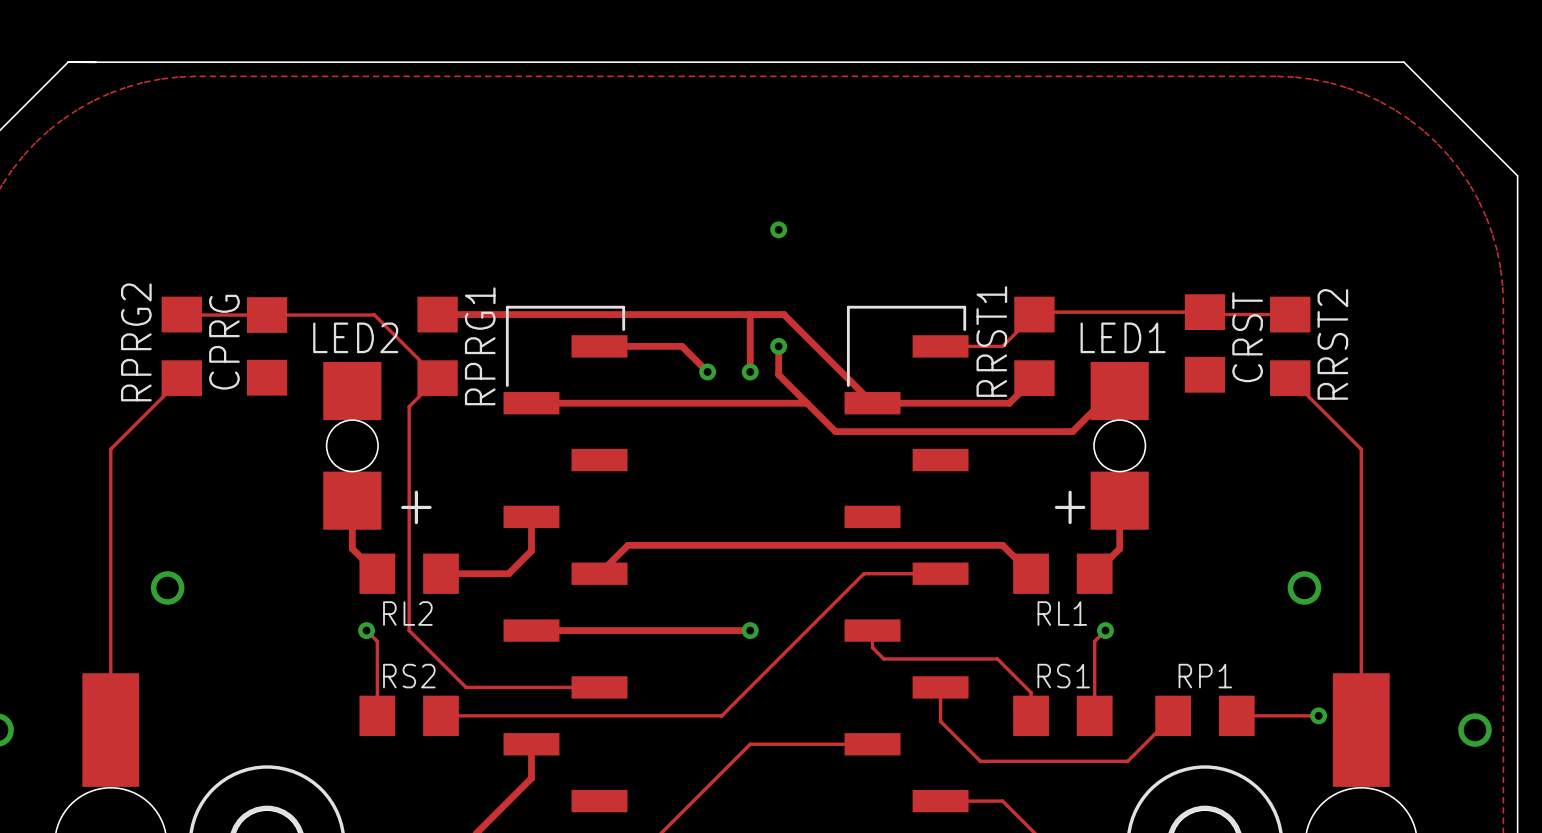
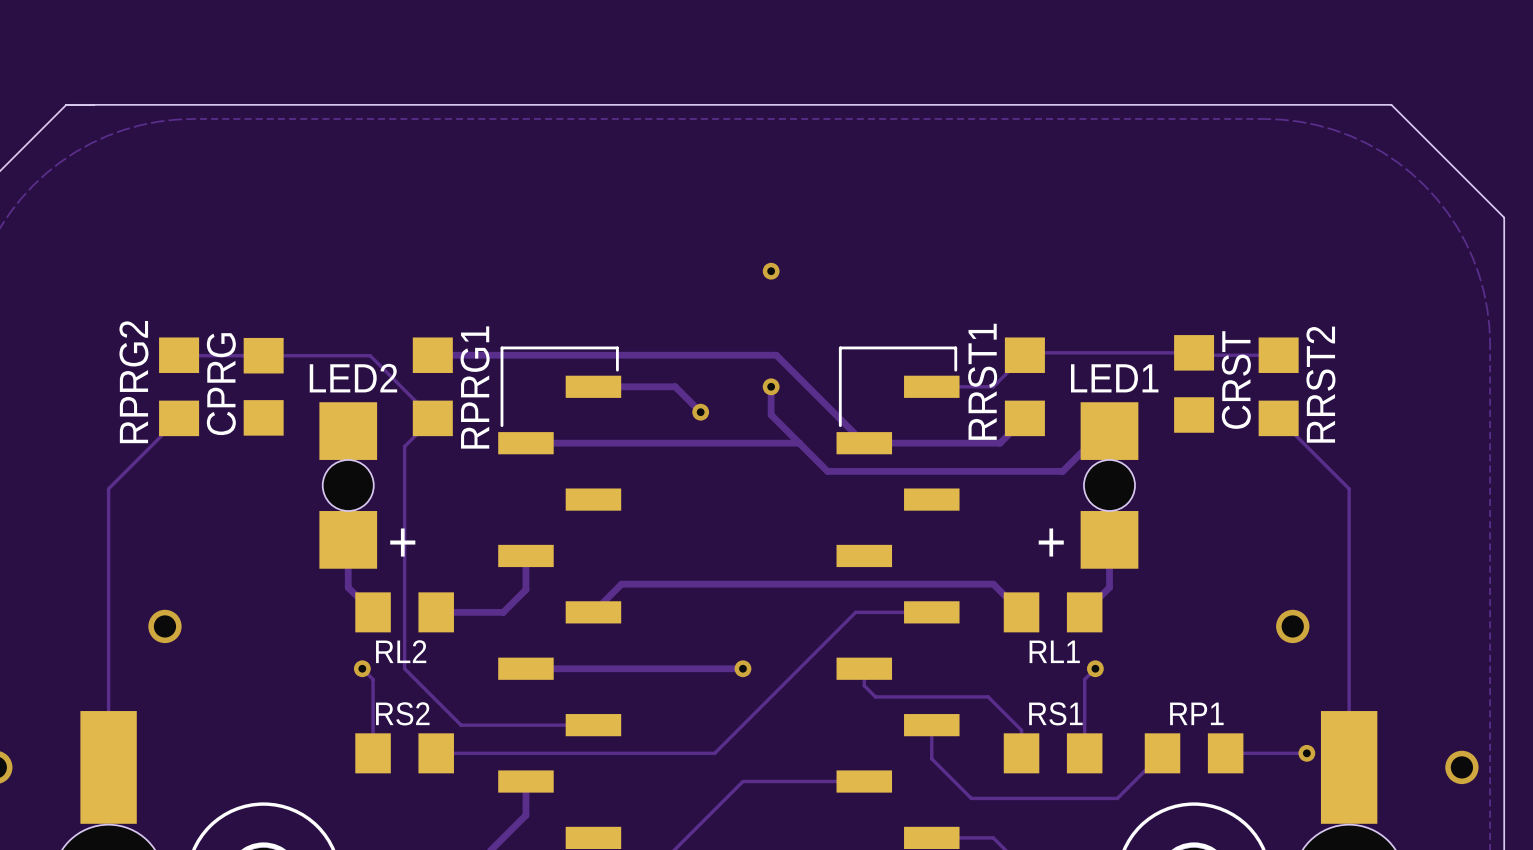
track: (750, 314) (750, 371) -> none
via: (750, 371) -> none

